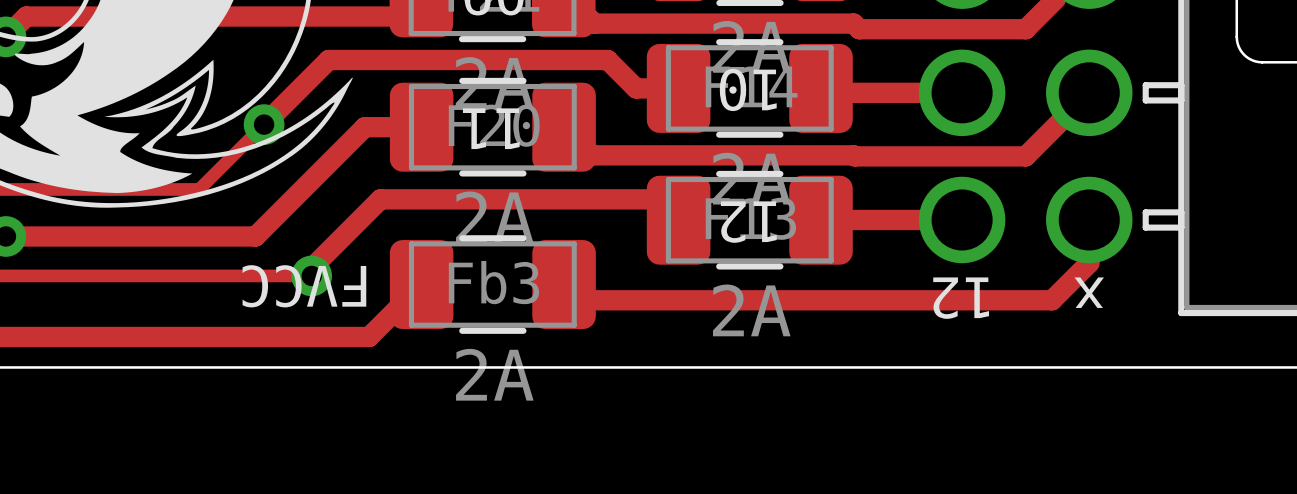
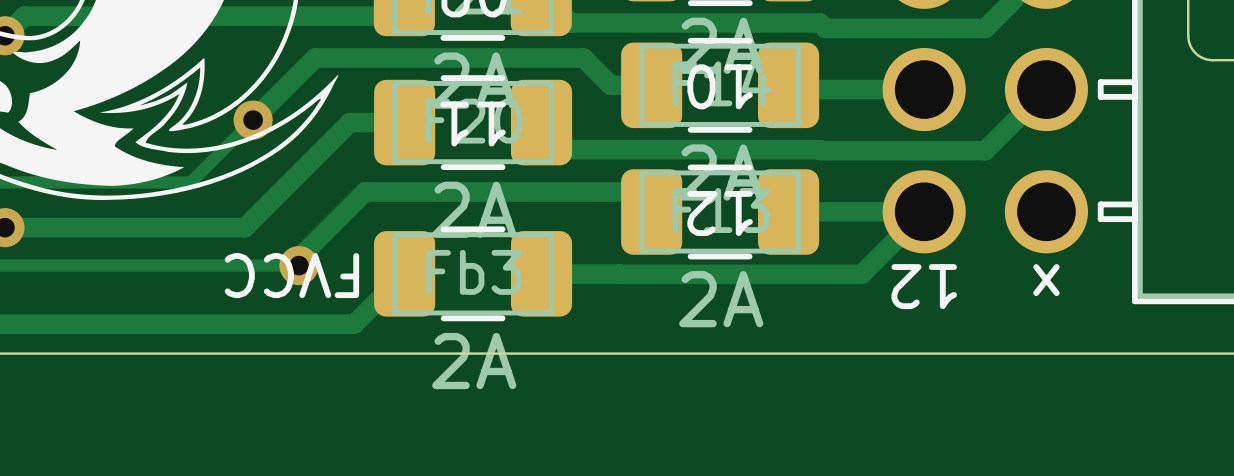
track: none -> (924, 211) (861, 274) (620, 274)
track: (1089, 219) (1089, 263) (1052, 300) (579, 300) -> none
track: none -> (541, 274) (619, 274)

